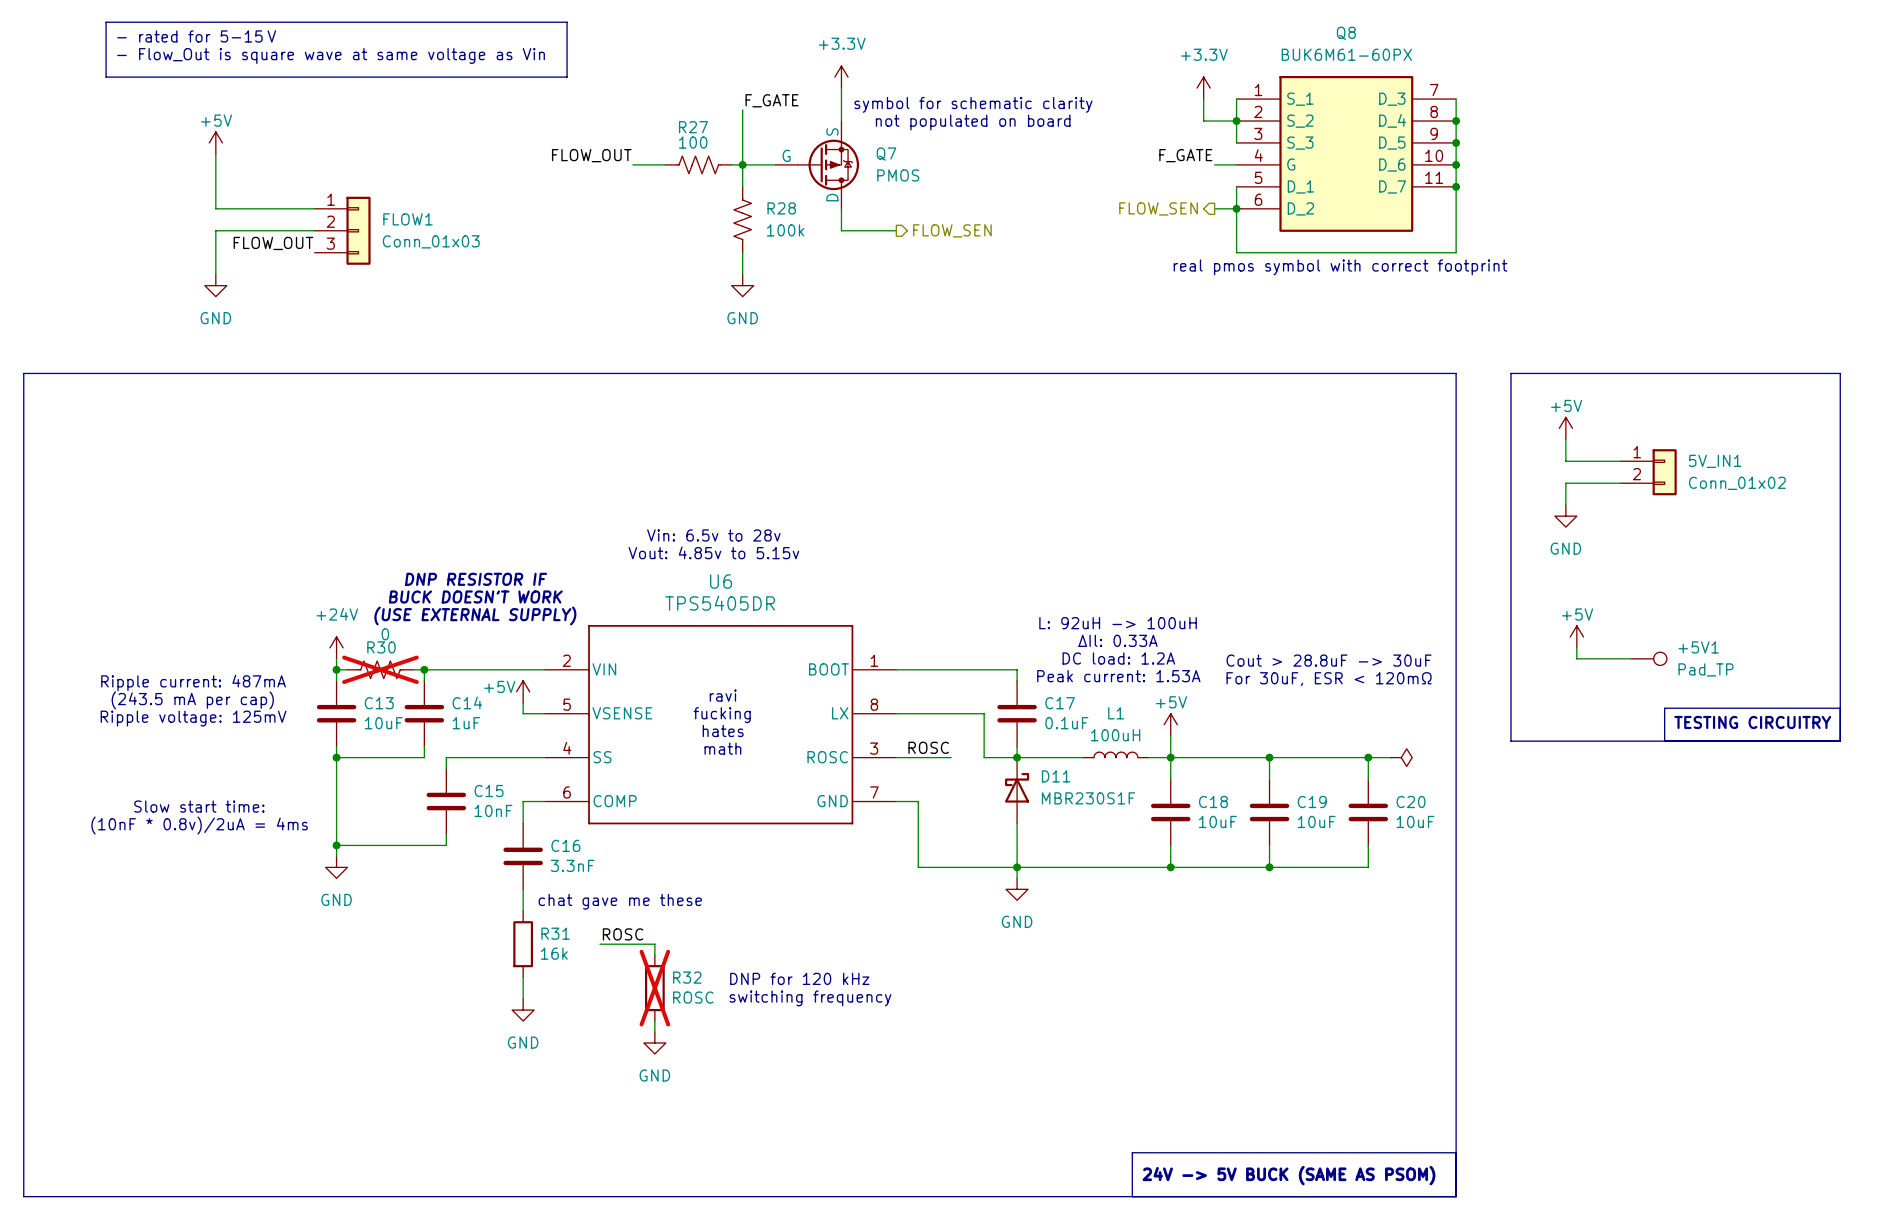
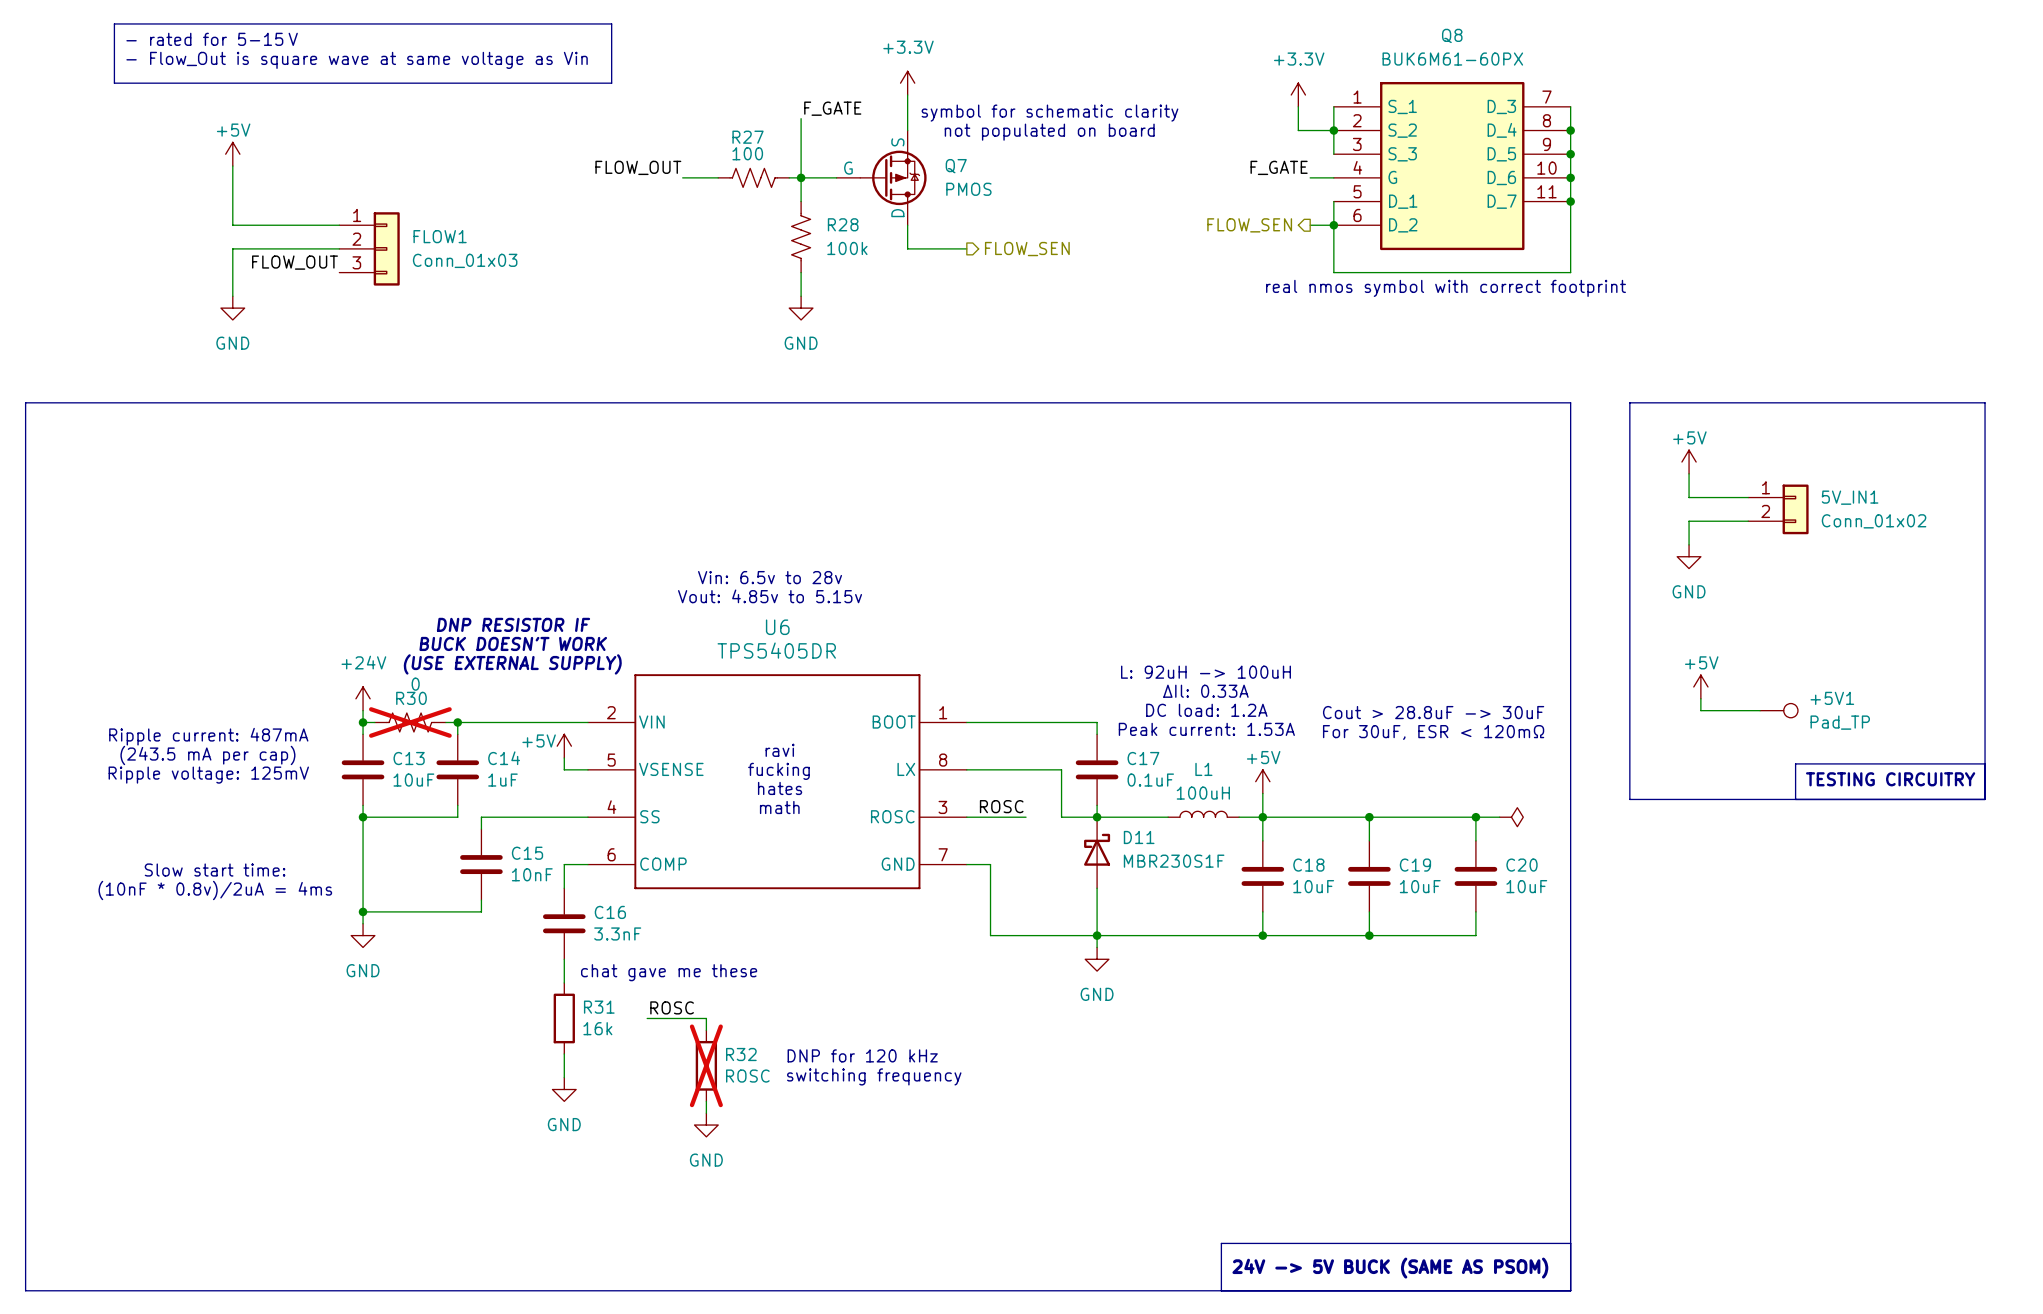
text: real pmos symbol with correct footprint (1340, 267) -> real nmos symbol with correct footprint (1445, 288)

